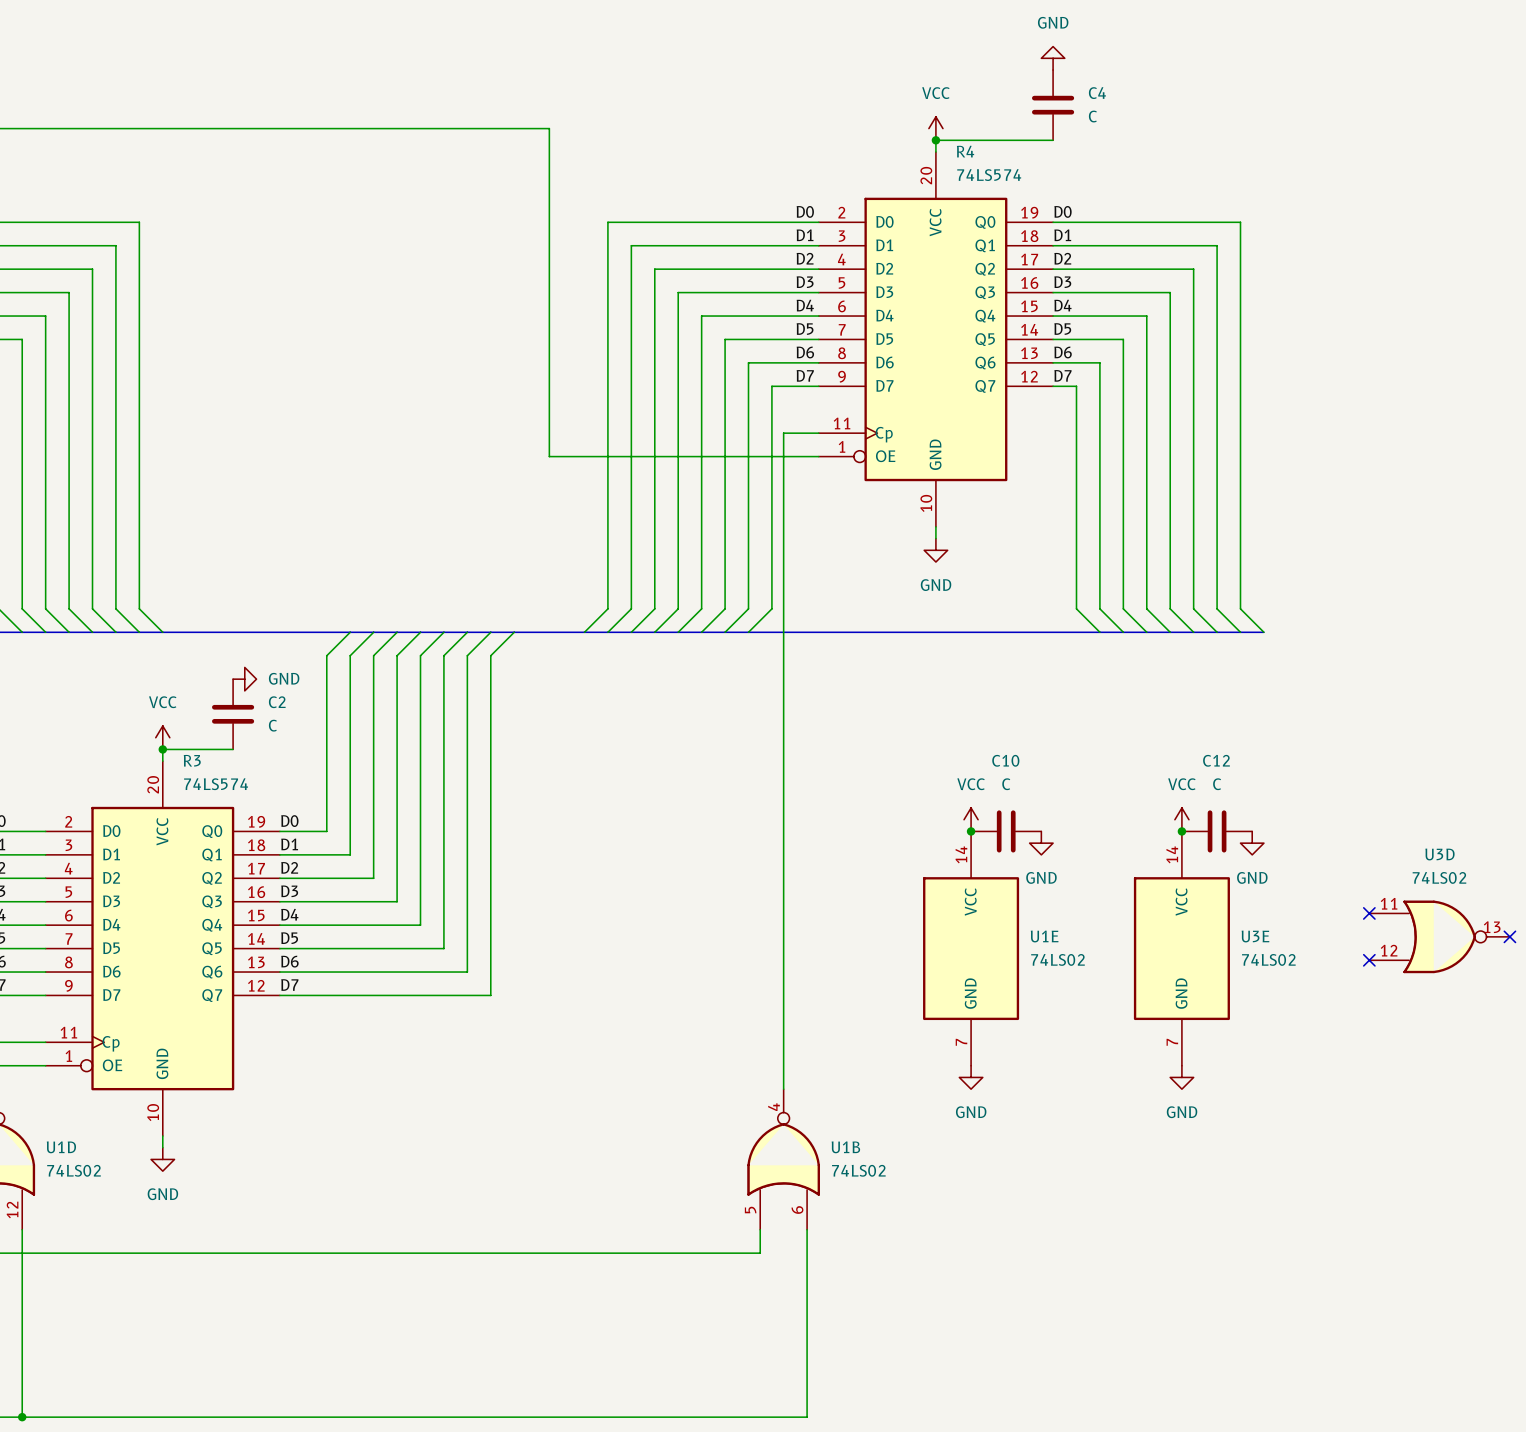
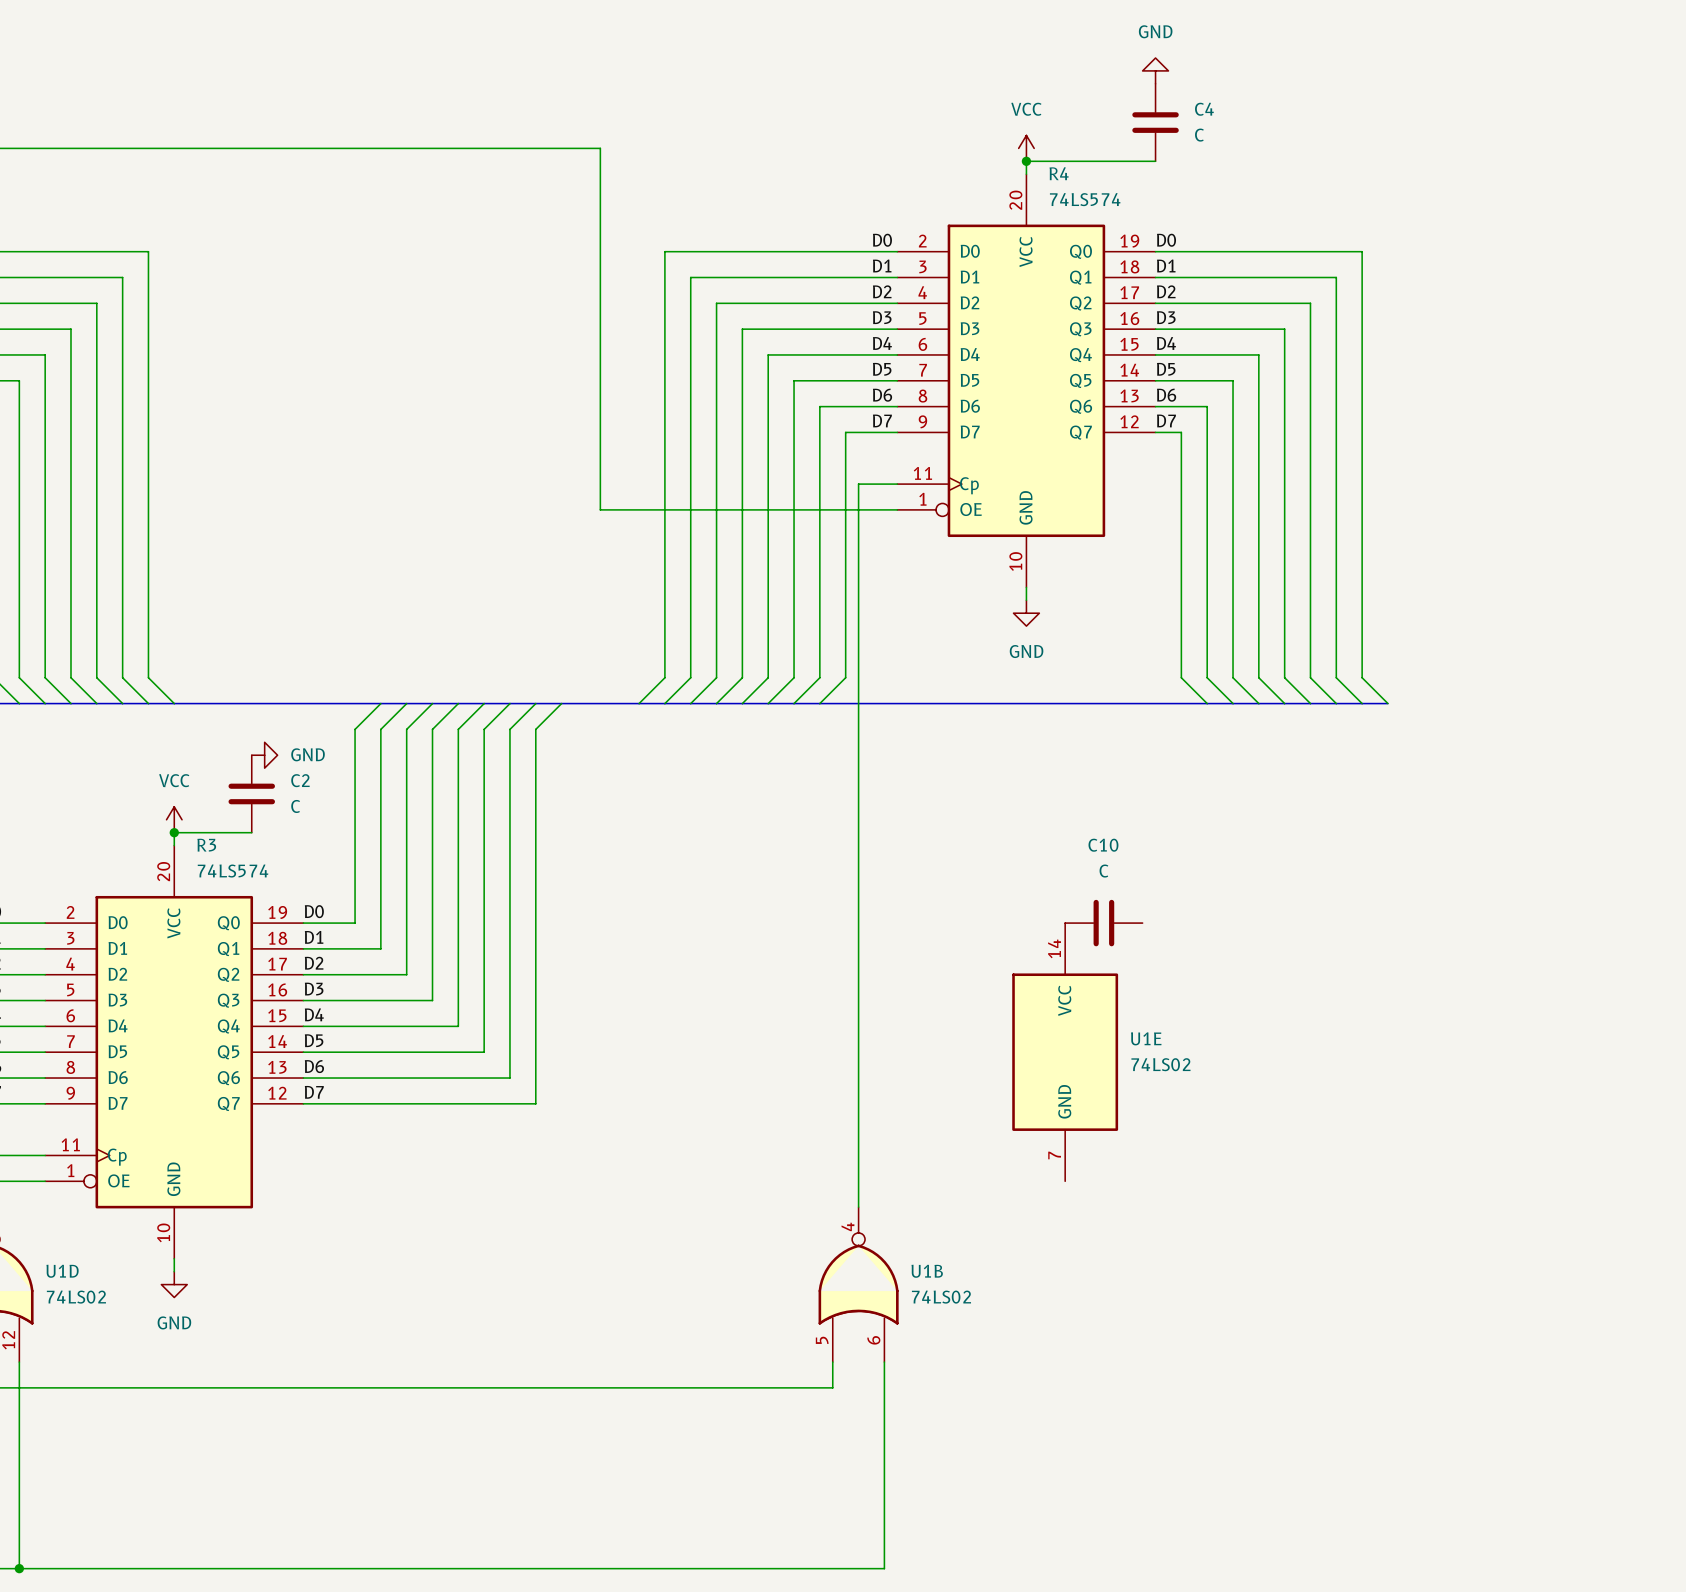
power symbol: VCC (971, 819) -> none
power symbol: VCC (1181, 819) -> none
junction: (971, 831) -> none
junction: (1181, 831) -> none
C12: C (1217, 831) -> none
power symbol: GND (1041, 843) -> none
power symbol: GND (1252, 843) -> none
no-connect mark: (1369, 913) -> none
U3D: 74LS02 (1439, 936) -> none
no-connect mark: (1509, 936) -> none
U3E: 74LS02 (1181, 948) -> none
no-connect mark: (1369, 960) -> none
power symbol: GND (971, 1077) -> none
power symbol: GND (1181, 1077) -> none

